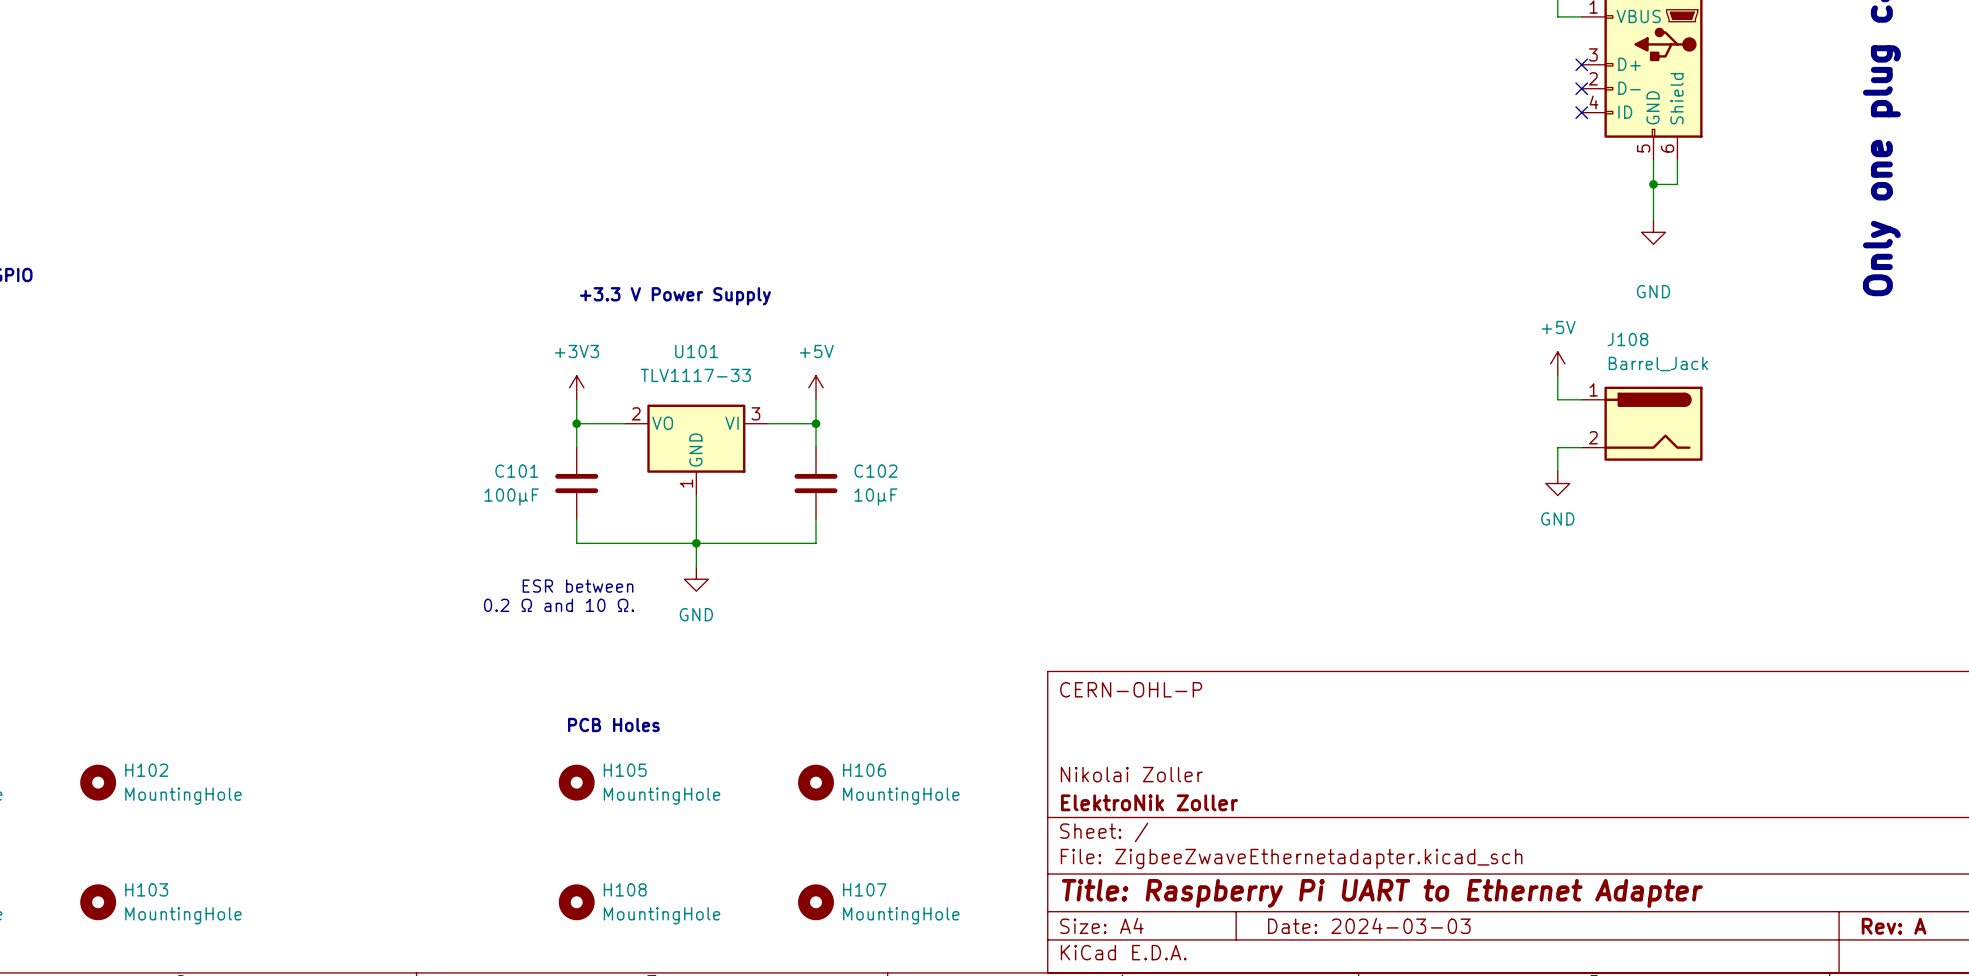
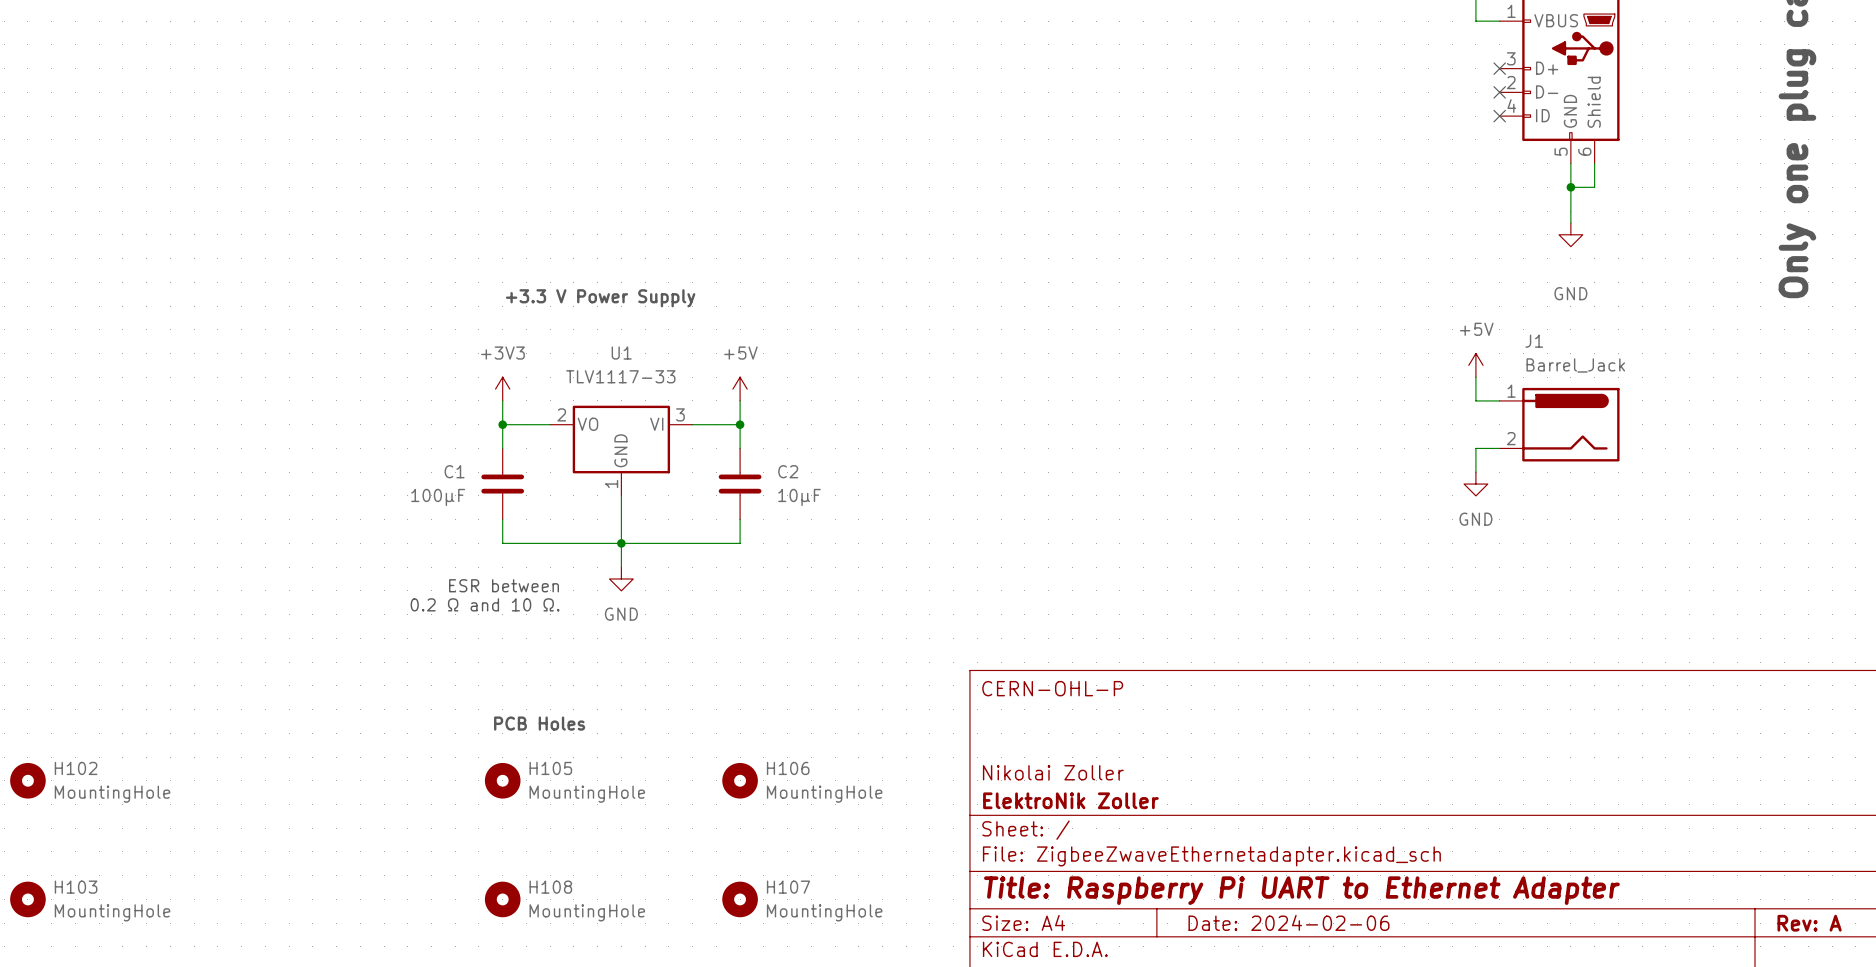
J108 name: J108 (1627, 339) -> J1 (1534, 341)
U101 name: U101 (696, 351) -> U1 (621, 353)
C101 name: C101 (516, 471) -> C1 (454, 471)
C102 name: C102 (875, 471) -> C2 (788, 471)
title block: Date: 2024-03-03 (1369, 925) -> Date: 2024-02-06 (1288, 922)

